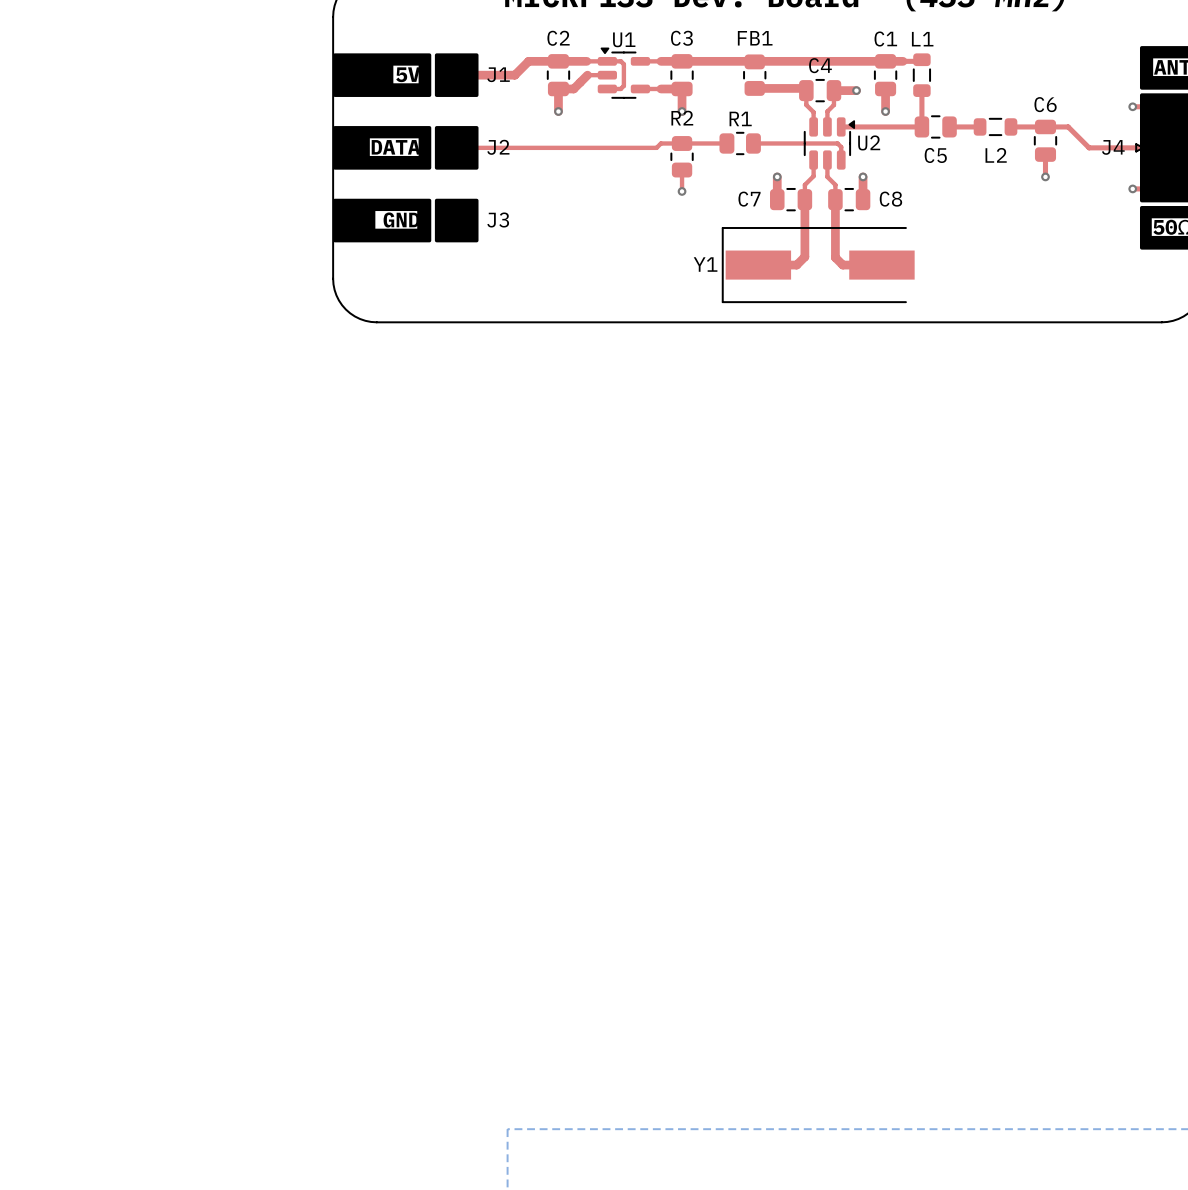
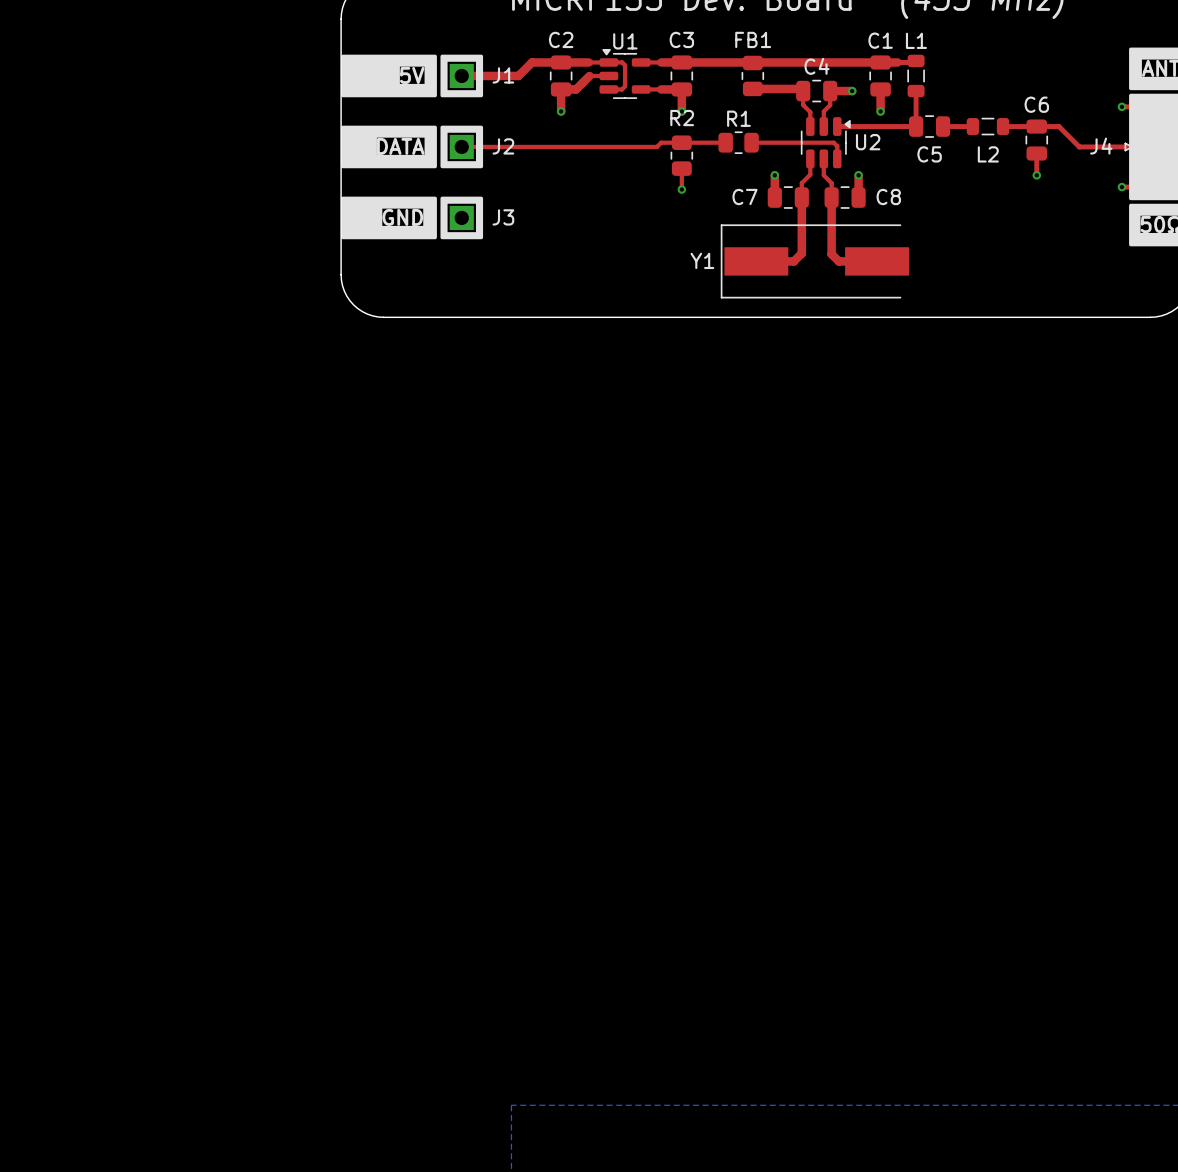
drawing shape: [434, 53, 479, 97] -> [440, 54, 484, 98]
drawing shape: [434, 126, 479, 170] -> [440, 125, 484, 169]
drawing shape: [434, 198, 479, 243] -> [440, 196, 484, 240]

